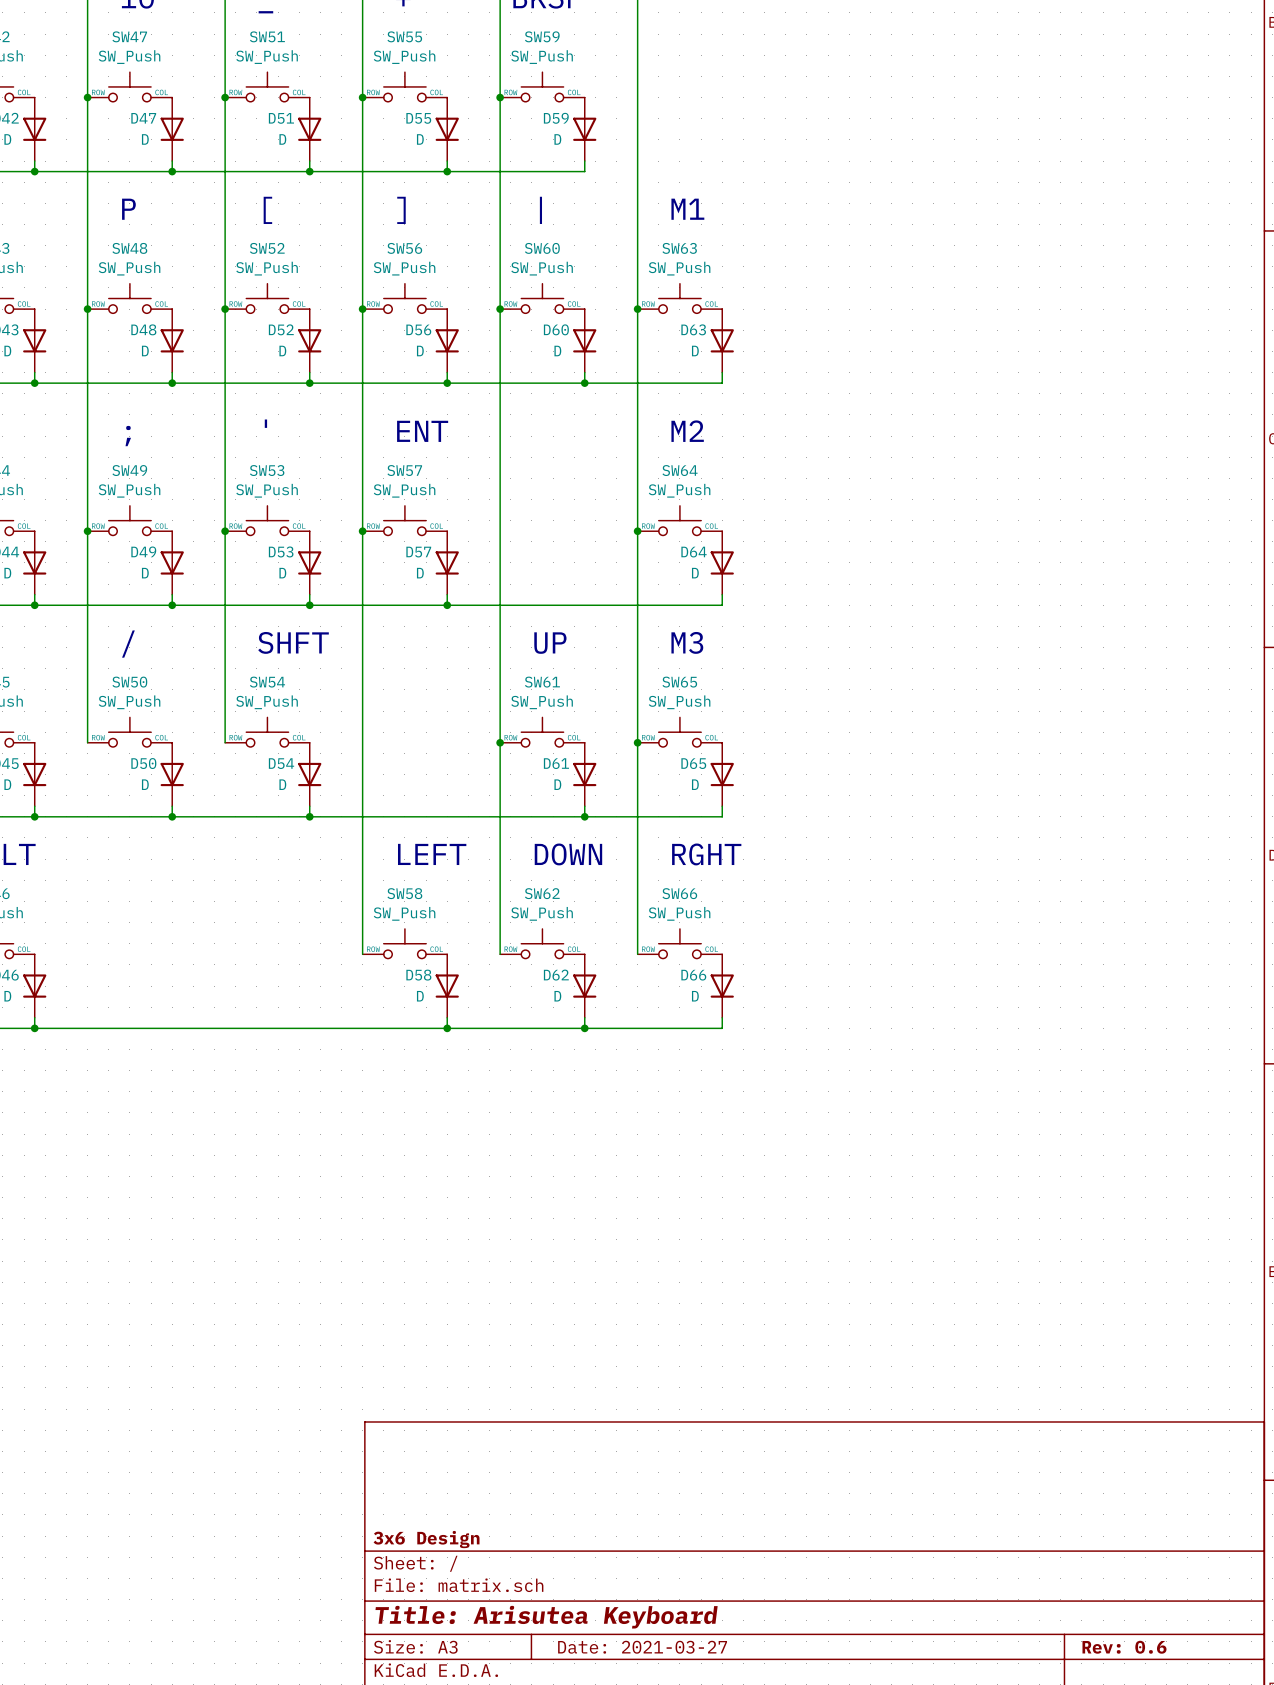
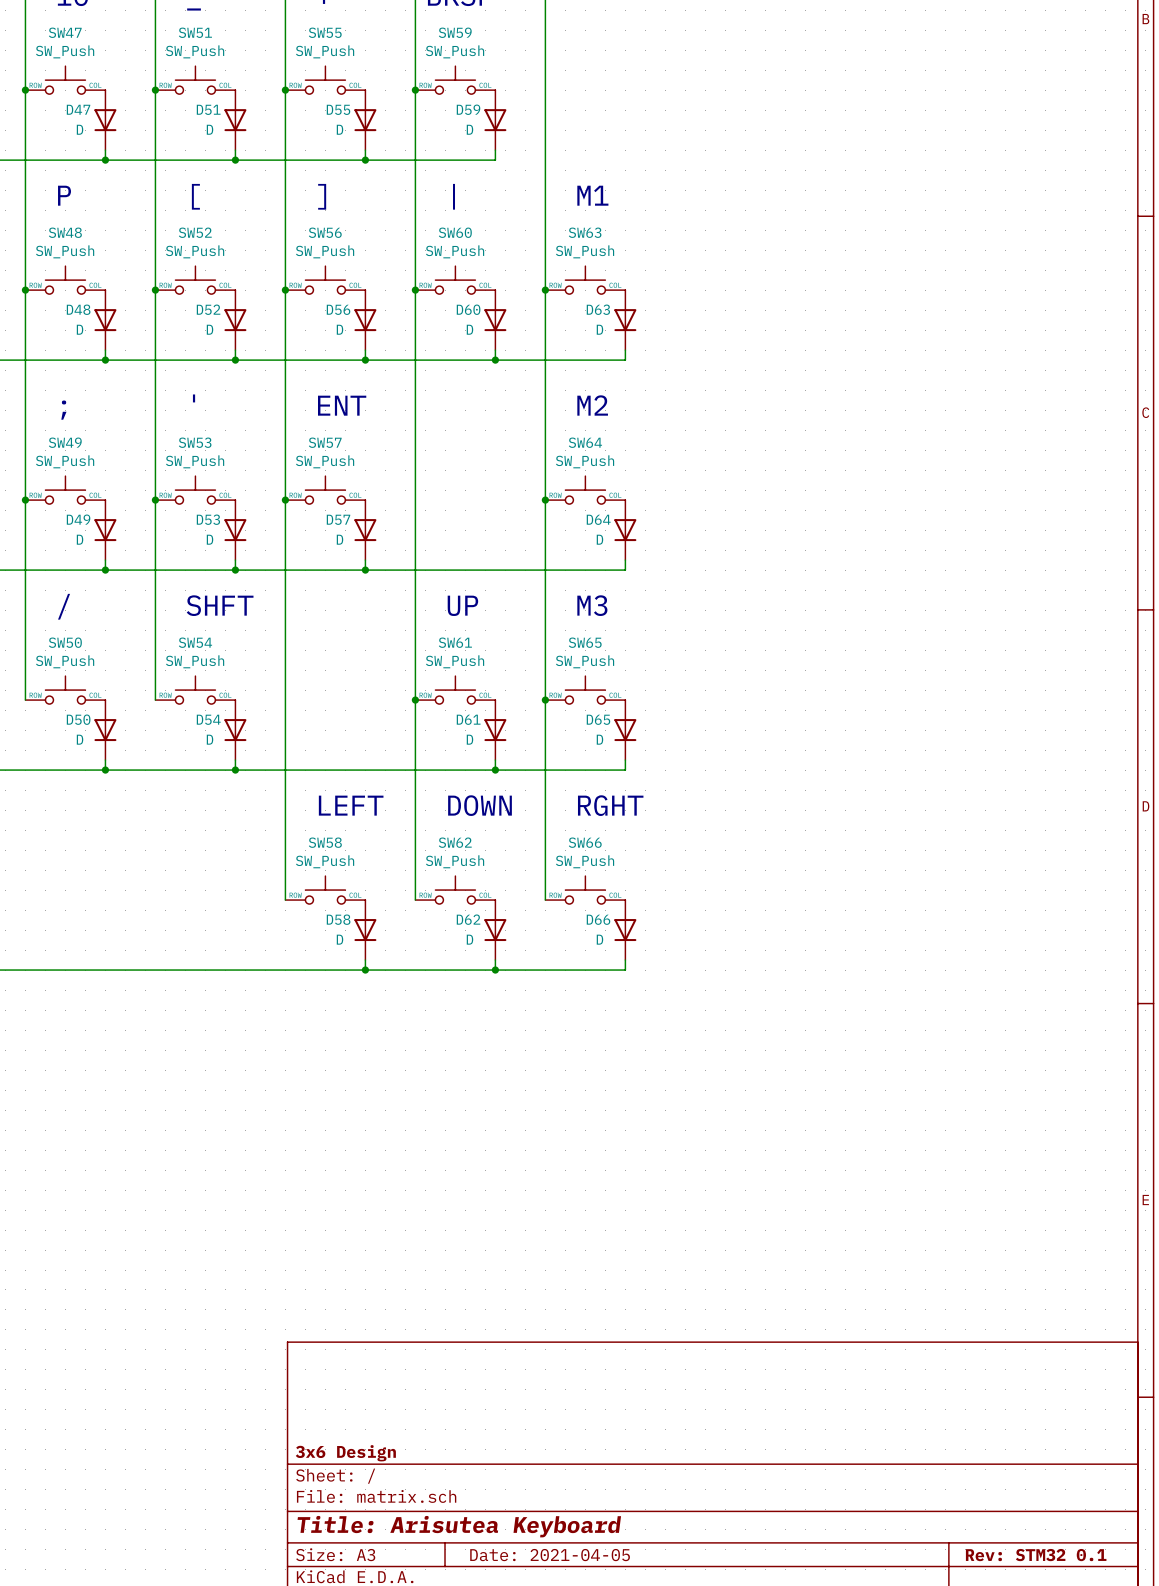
title block: Date: 2021-03-27 (642, 1647) -> Date: 2021-04-05 (550, 1555)
title block: Rev: 0.6 (1124, 1647) -> Rev: STM32 0.1 (1036, 1555)

